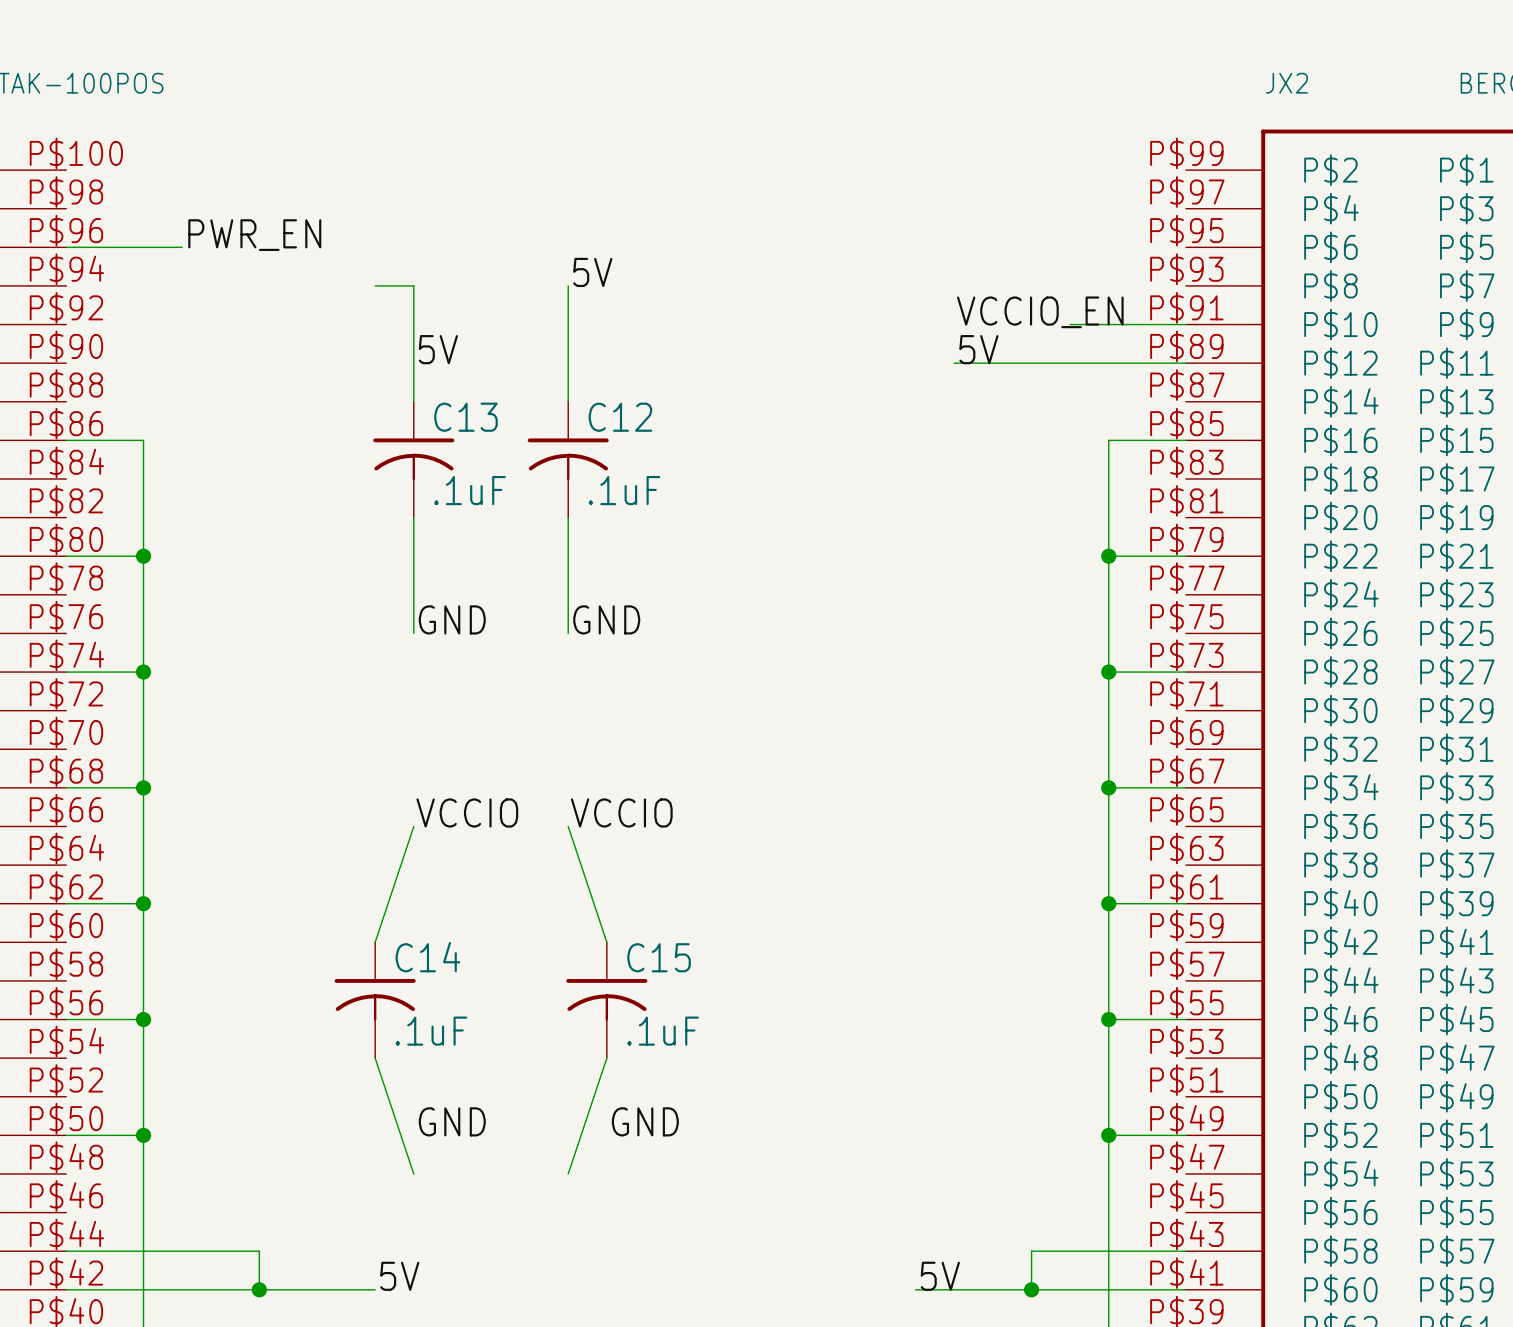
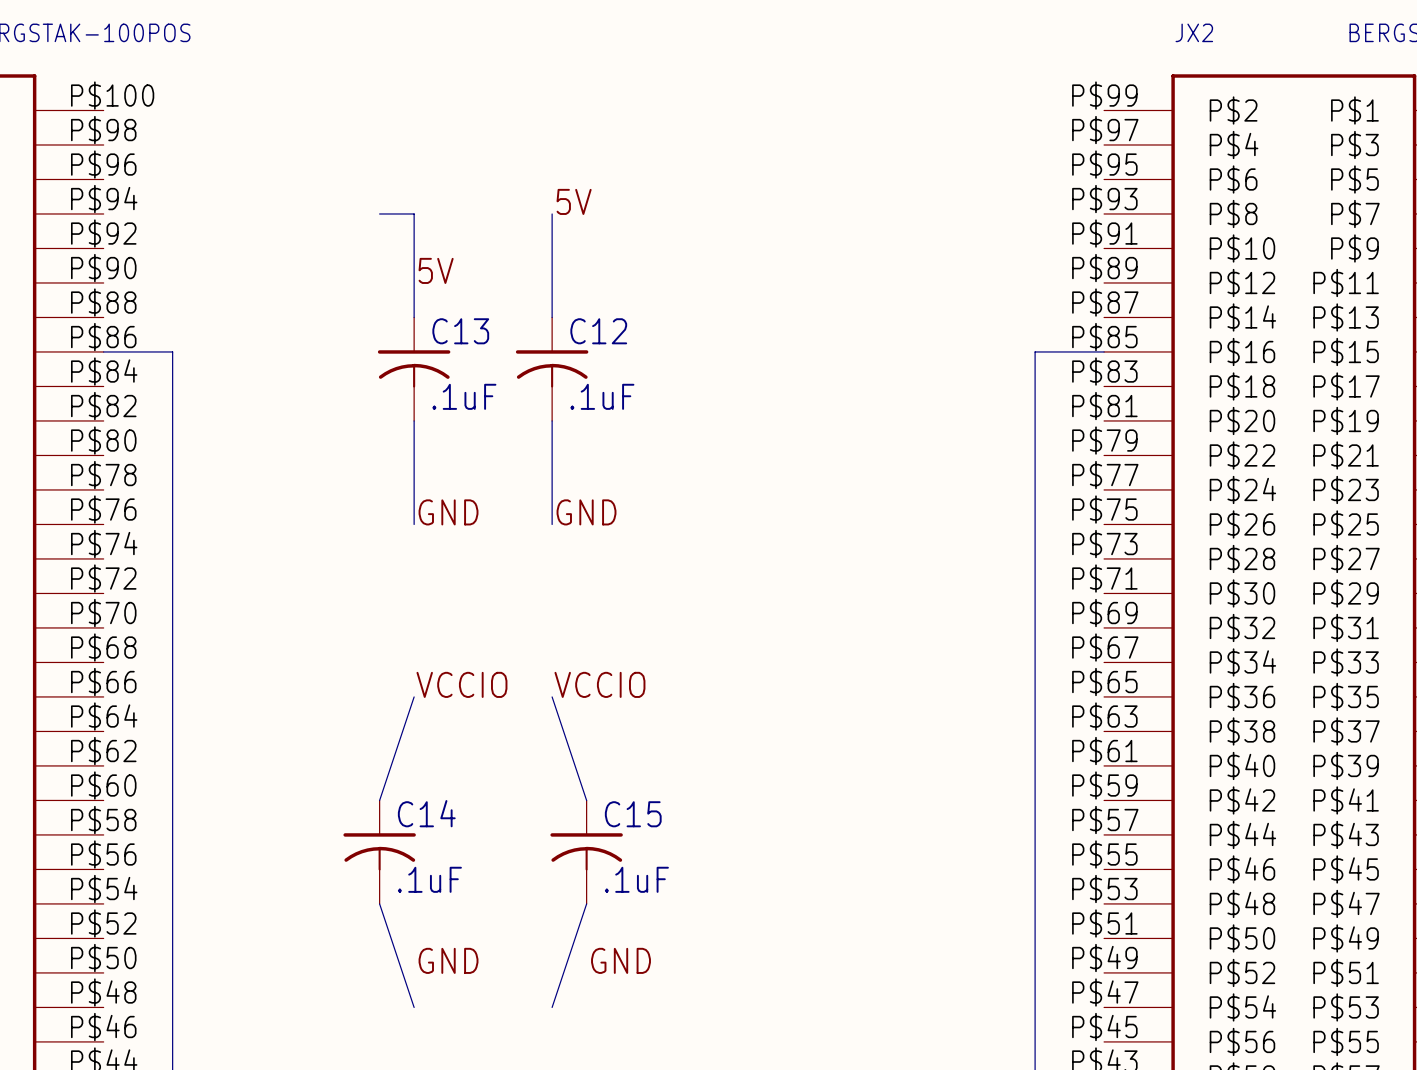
label: PWR_EN (254, 235) -> none
wire: (66, 247) (182, 247) -> none
label: VCCIO_EN (1040, 312) -> none
wire: (1070, 324) (1185, 324) -> none
label: 5V (978, 349) -> none
wire: (954, 363) (1185, 363) -> none
wire: (66, 556) (143, 556) -> none
junction: (143, 556) -> none
wire: (1108, 556) (1185, 556) -> none
junction: (1108, 556) -> none
wire: (66, 672) (143, 672) -> none
junction: (143, 672) -> none
wire: (1108, 672) (1185, 672) -> none
junction: (1108, 672) -> none
wire: (66, 787) (143, 787) -> none
junction: (143, 787) -> none
wire: (1108, 787) (1185, 787) -> none
junction: (1108, 787) -> none
wire: (66, 903) (143, 903) -> none
junction: (143, 903) -> none
wire: (1108, 903) (1185, 903) -> none
junction: (1108, 903) -> none
wire: (66, 1019) (143, 1019) -> none
junction: (143, 1019) -> none
wire: (1108, 1019) (1185, 1019) -> none
junction: (1108, 1019) -> none
wire: (66, 1135) (143, 1135) -> none
junction: (143, 1135) -> none
wire: (1108, 1135) (1185, 1135) -> none
junction: (1108, 1135) -> none

